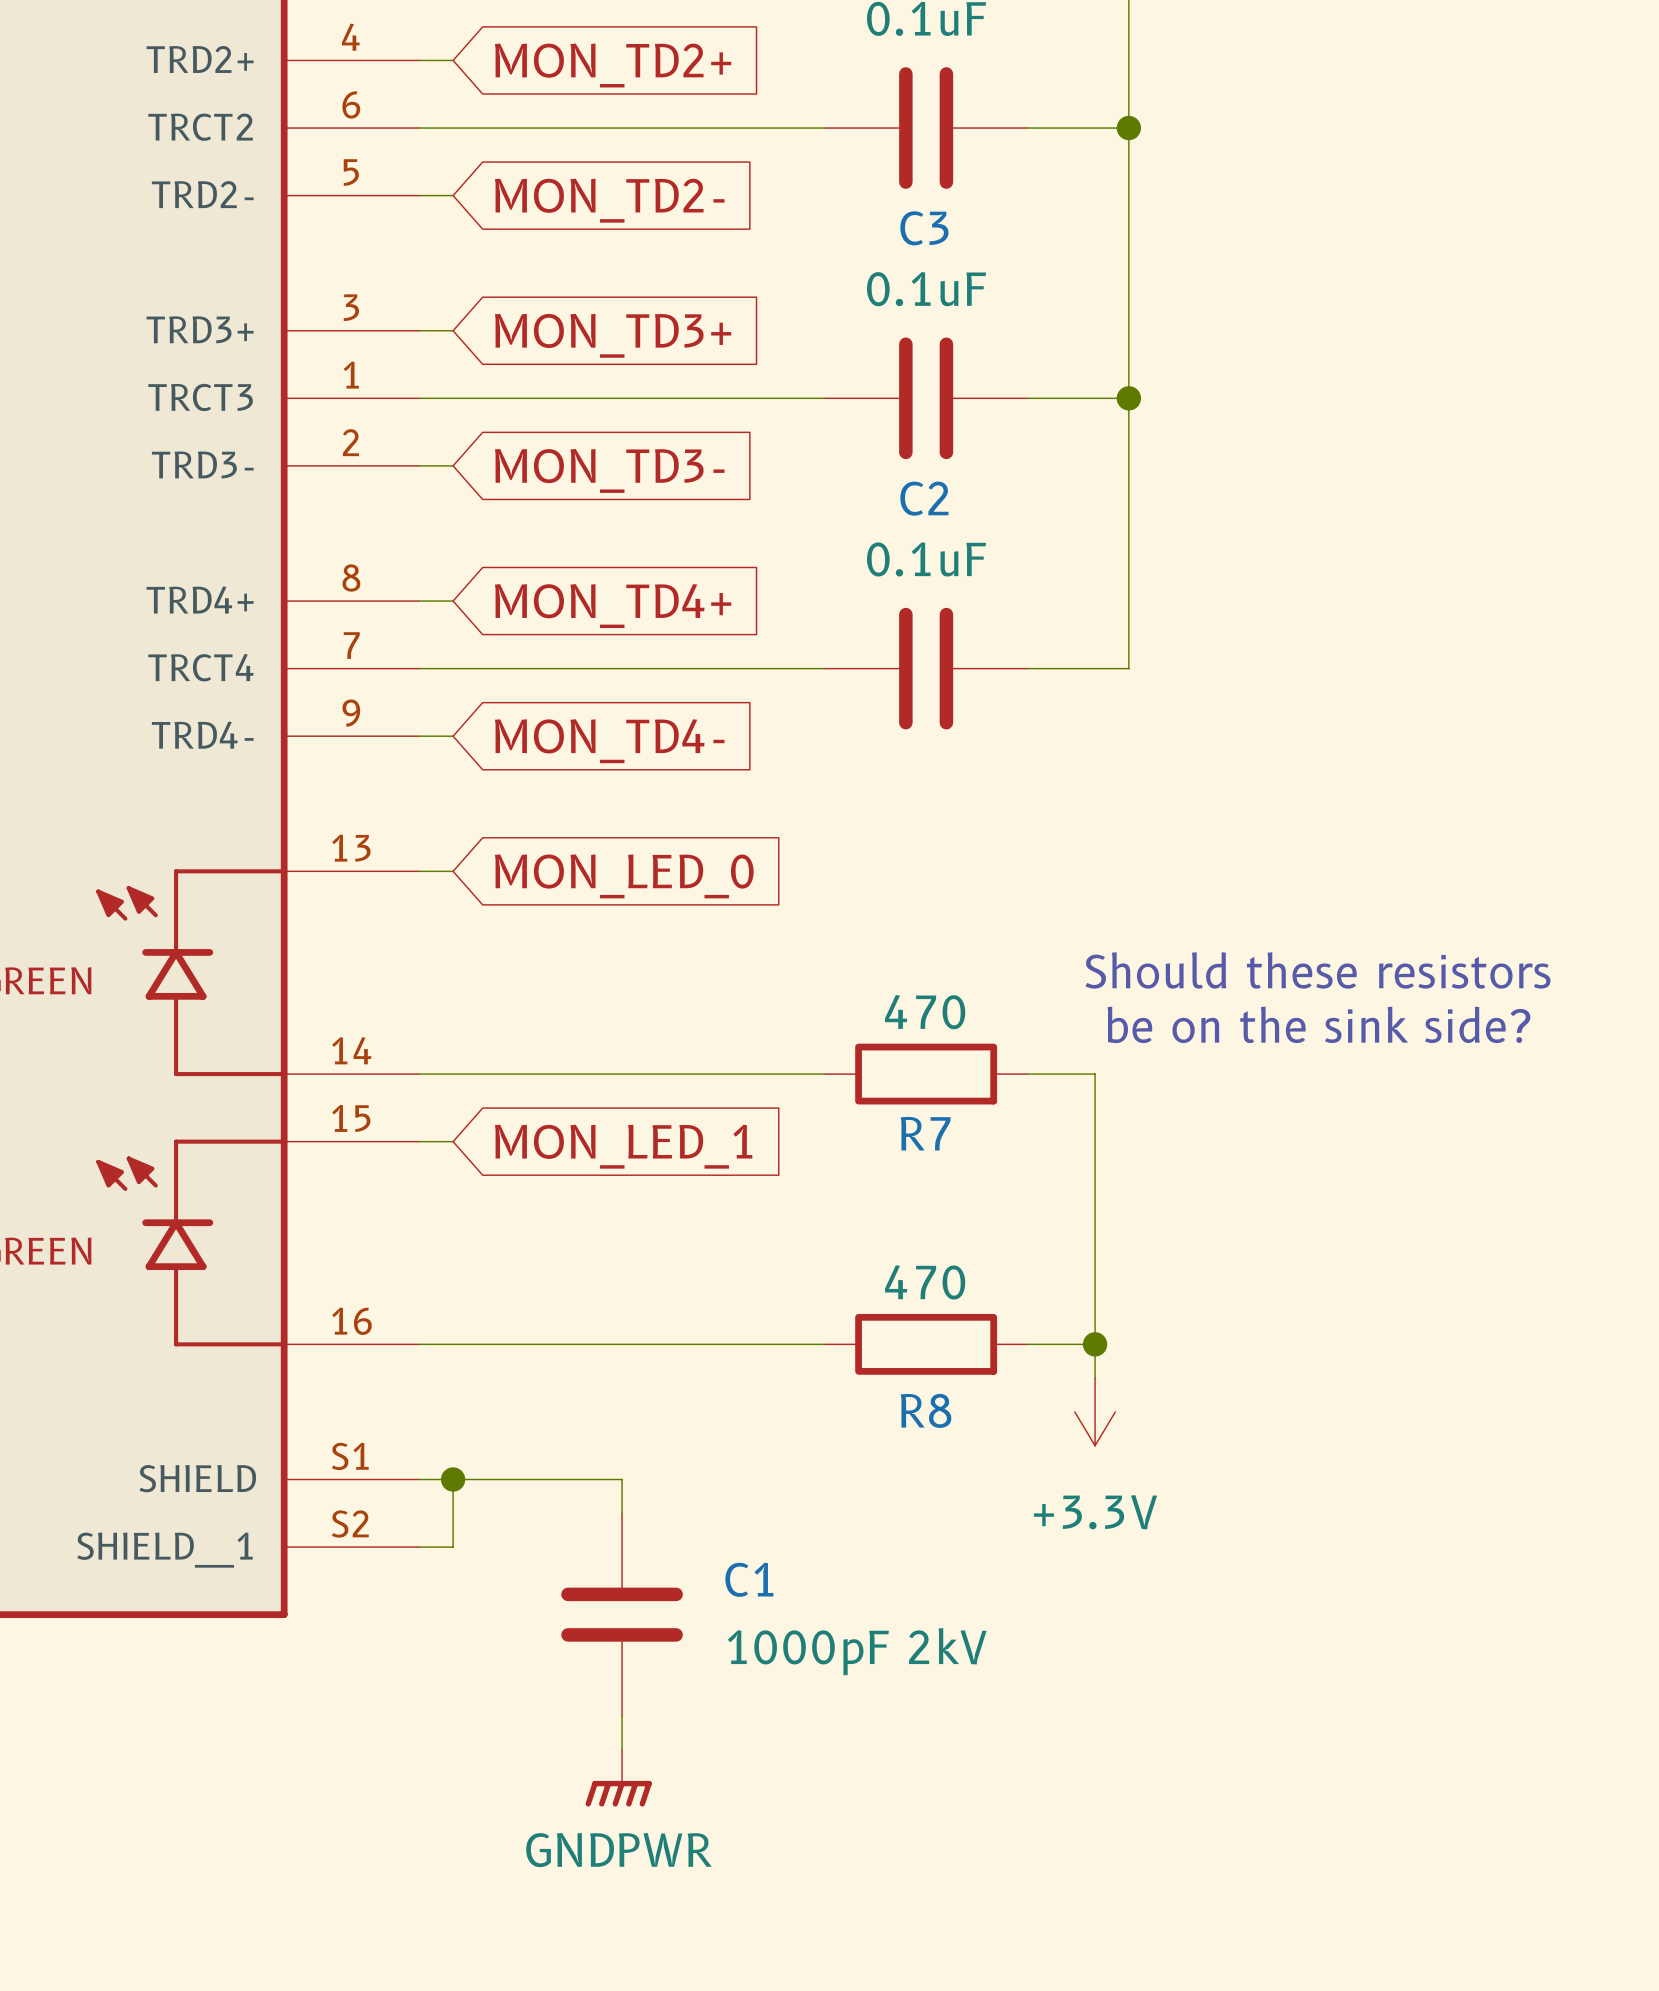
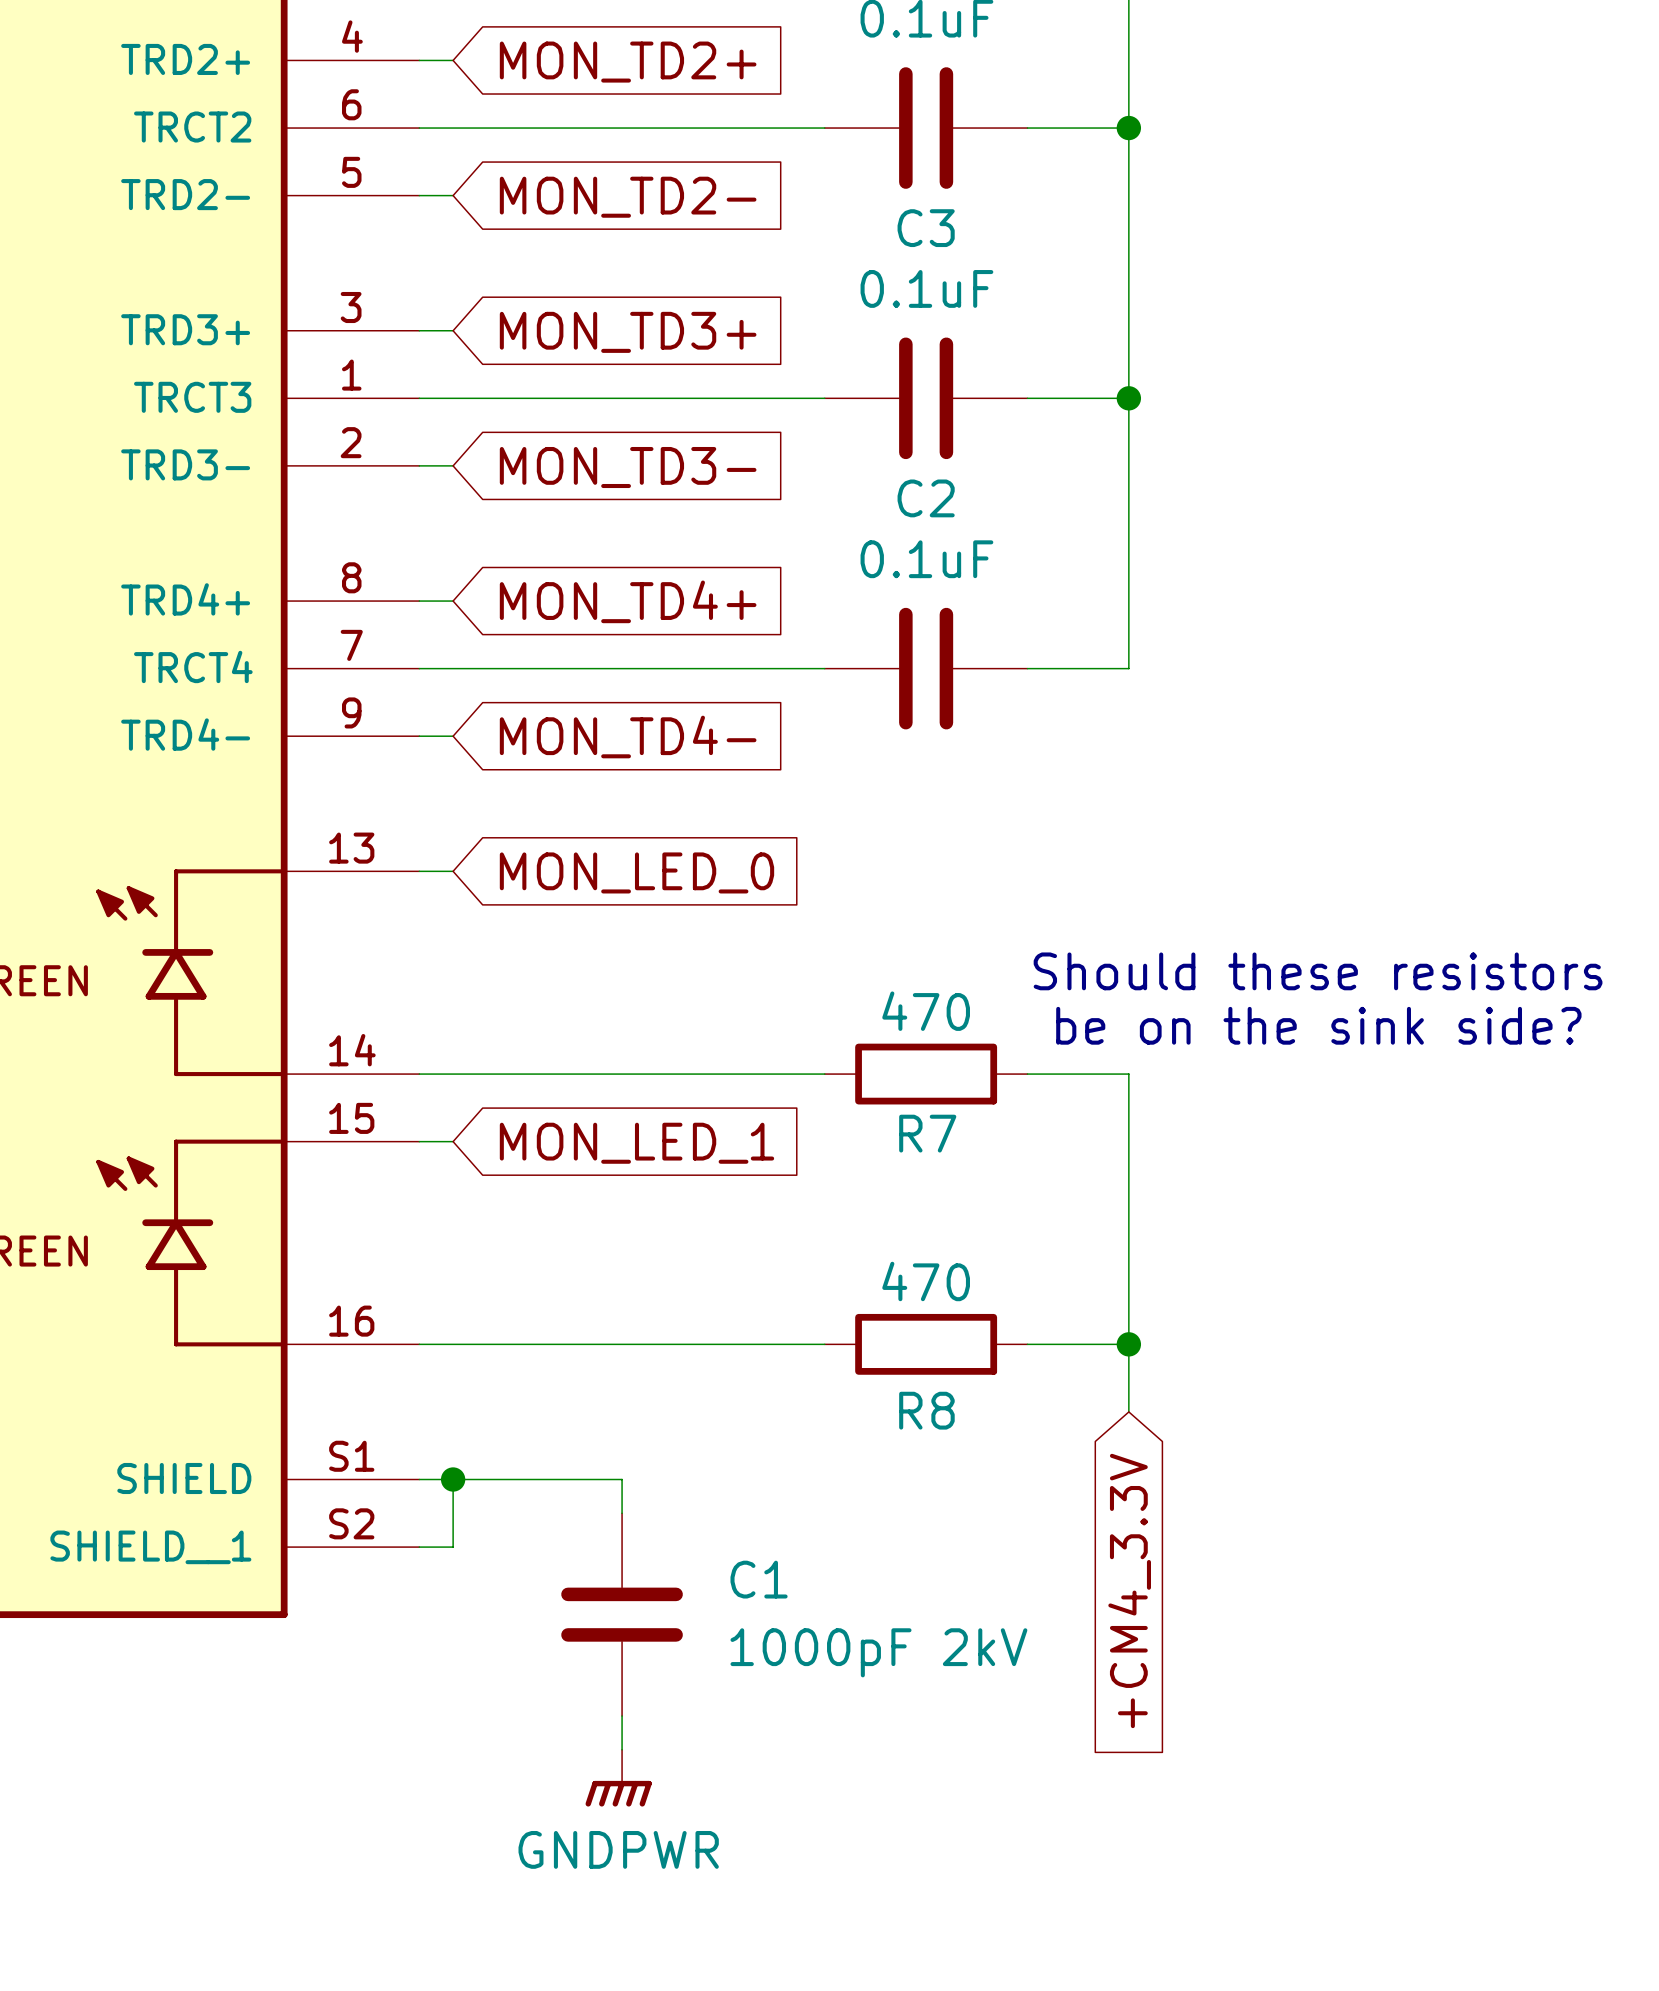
wire: (1095, 1074) (1095, 1378) -> (1095, 1074) (1128, 1074) (1128, 1411)
wire: none -> (1095, 1344) (1128, 1344)
junction position: (1095, 1344) -> (1128, 1344)
power symbol: +3.3V (1095, 1411) -> none
global label: none -> +CM4_3.3V (1129, 1590)

